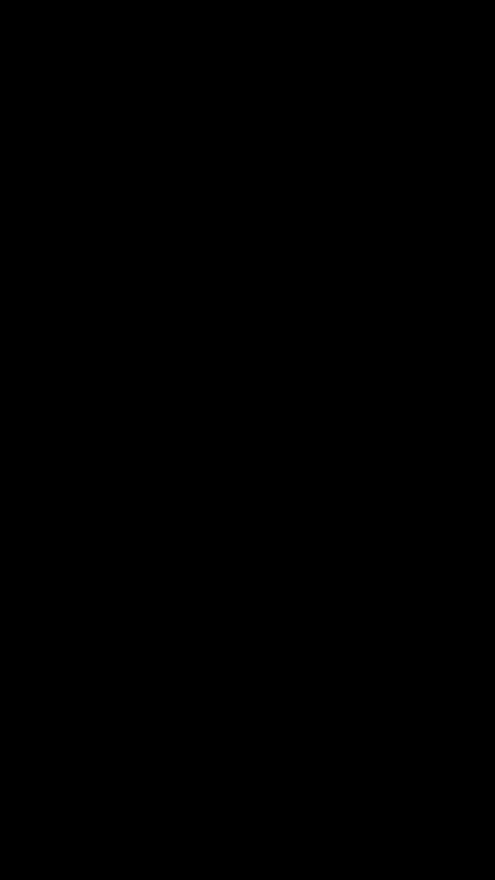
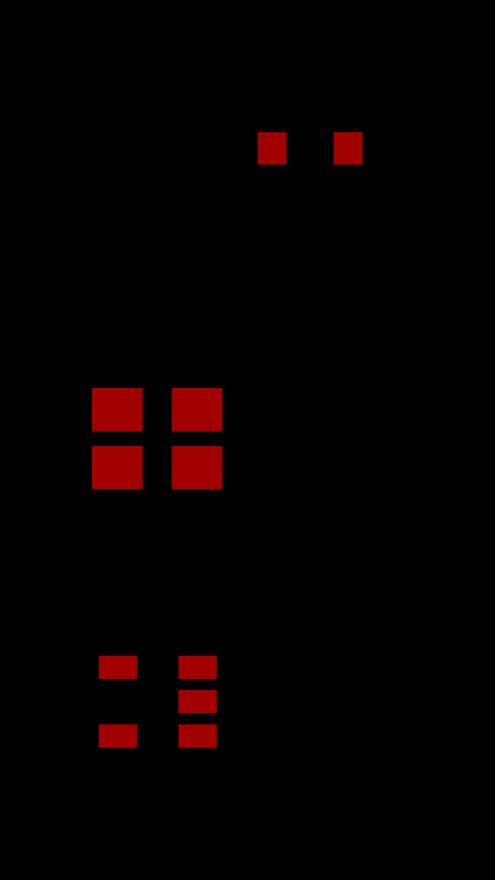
part: none -> (310, 148)
part: none -> (157, 438)
part: none -> (157, 701)

